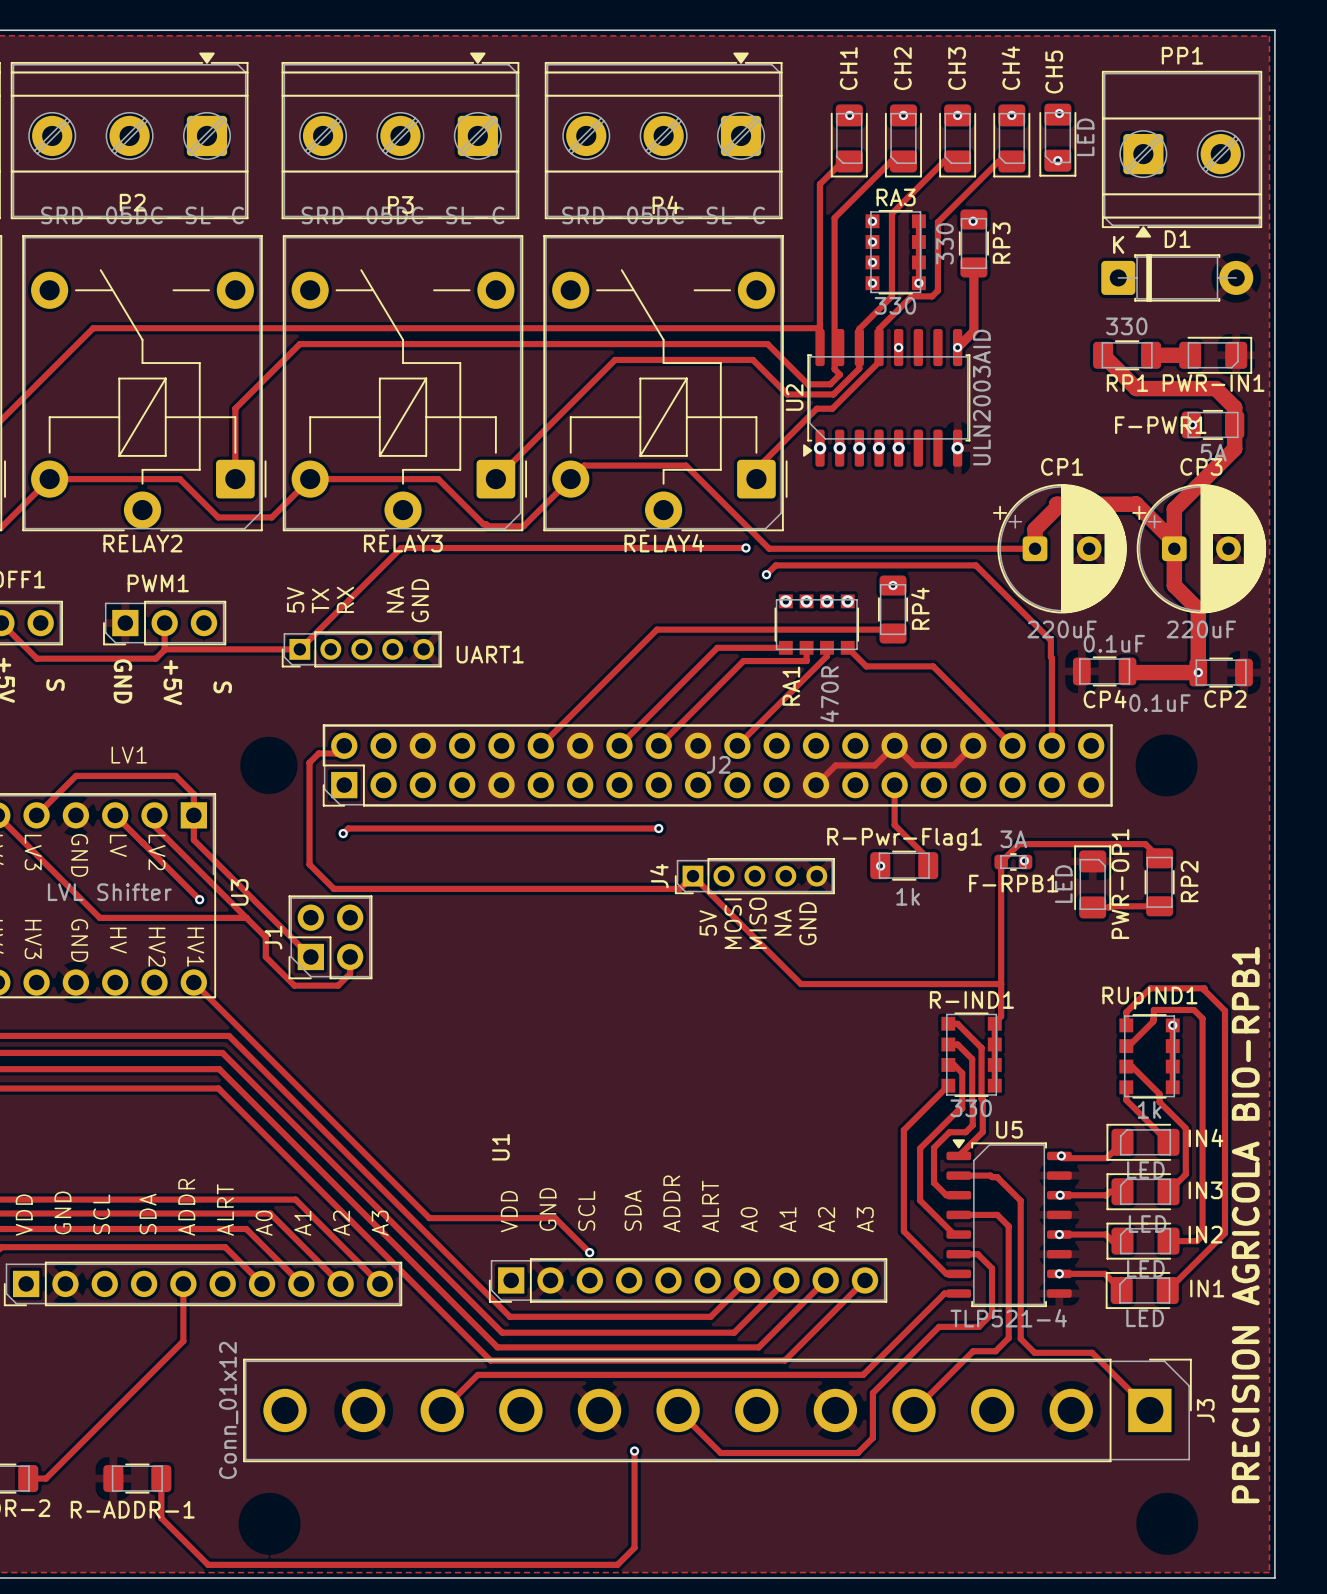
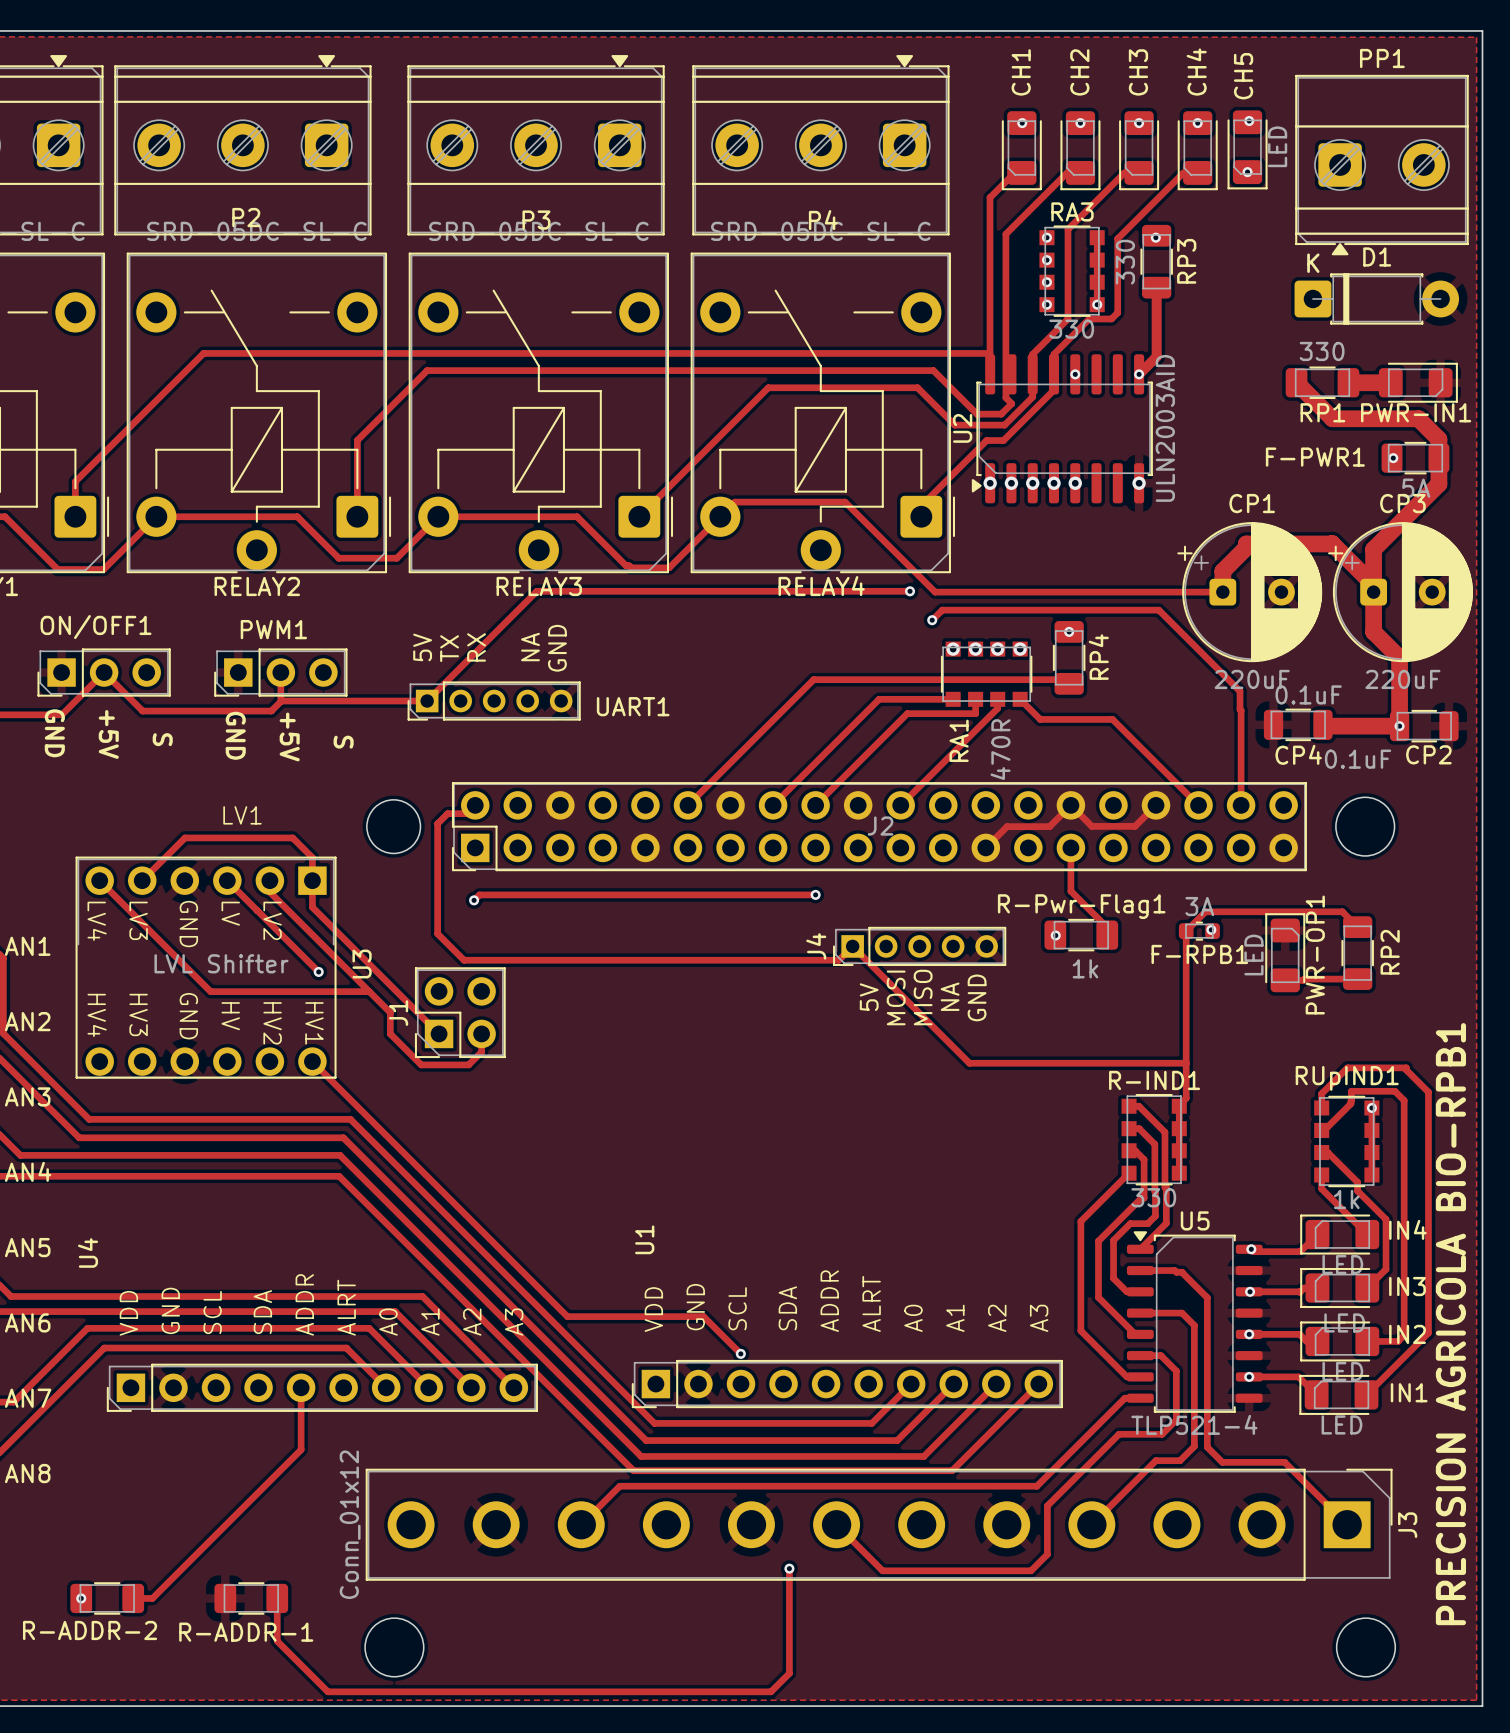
F-PWR1 name position: F-PWR1 (1160, 425) -> F-PWR1 (1315, 457)
J2 footprint: [242, 724, 1195, 1551] -> [365, 782, 1396, 1677]

